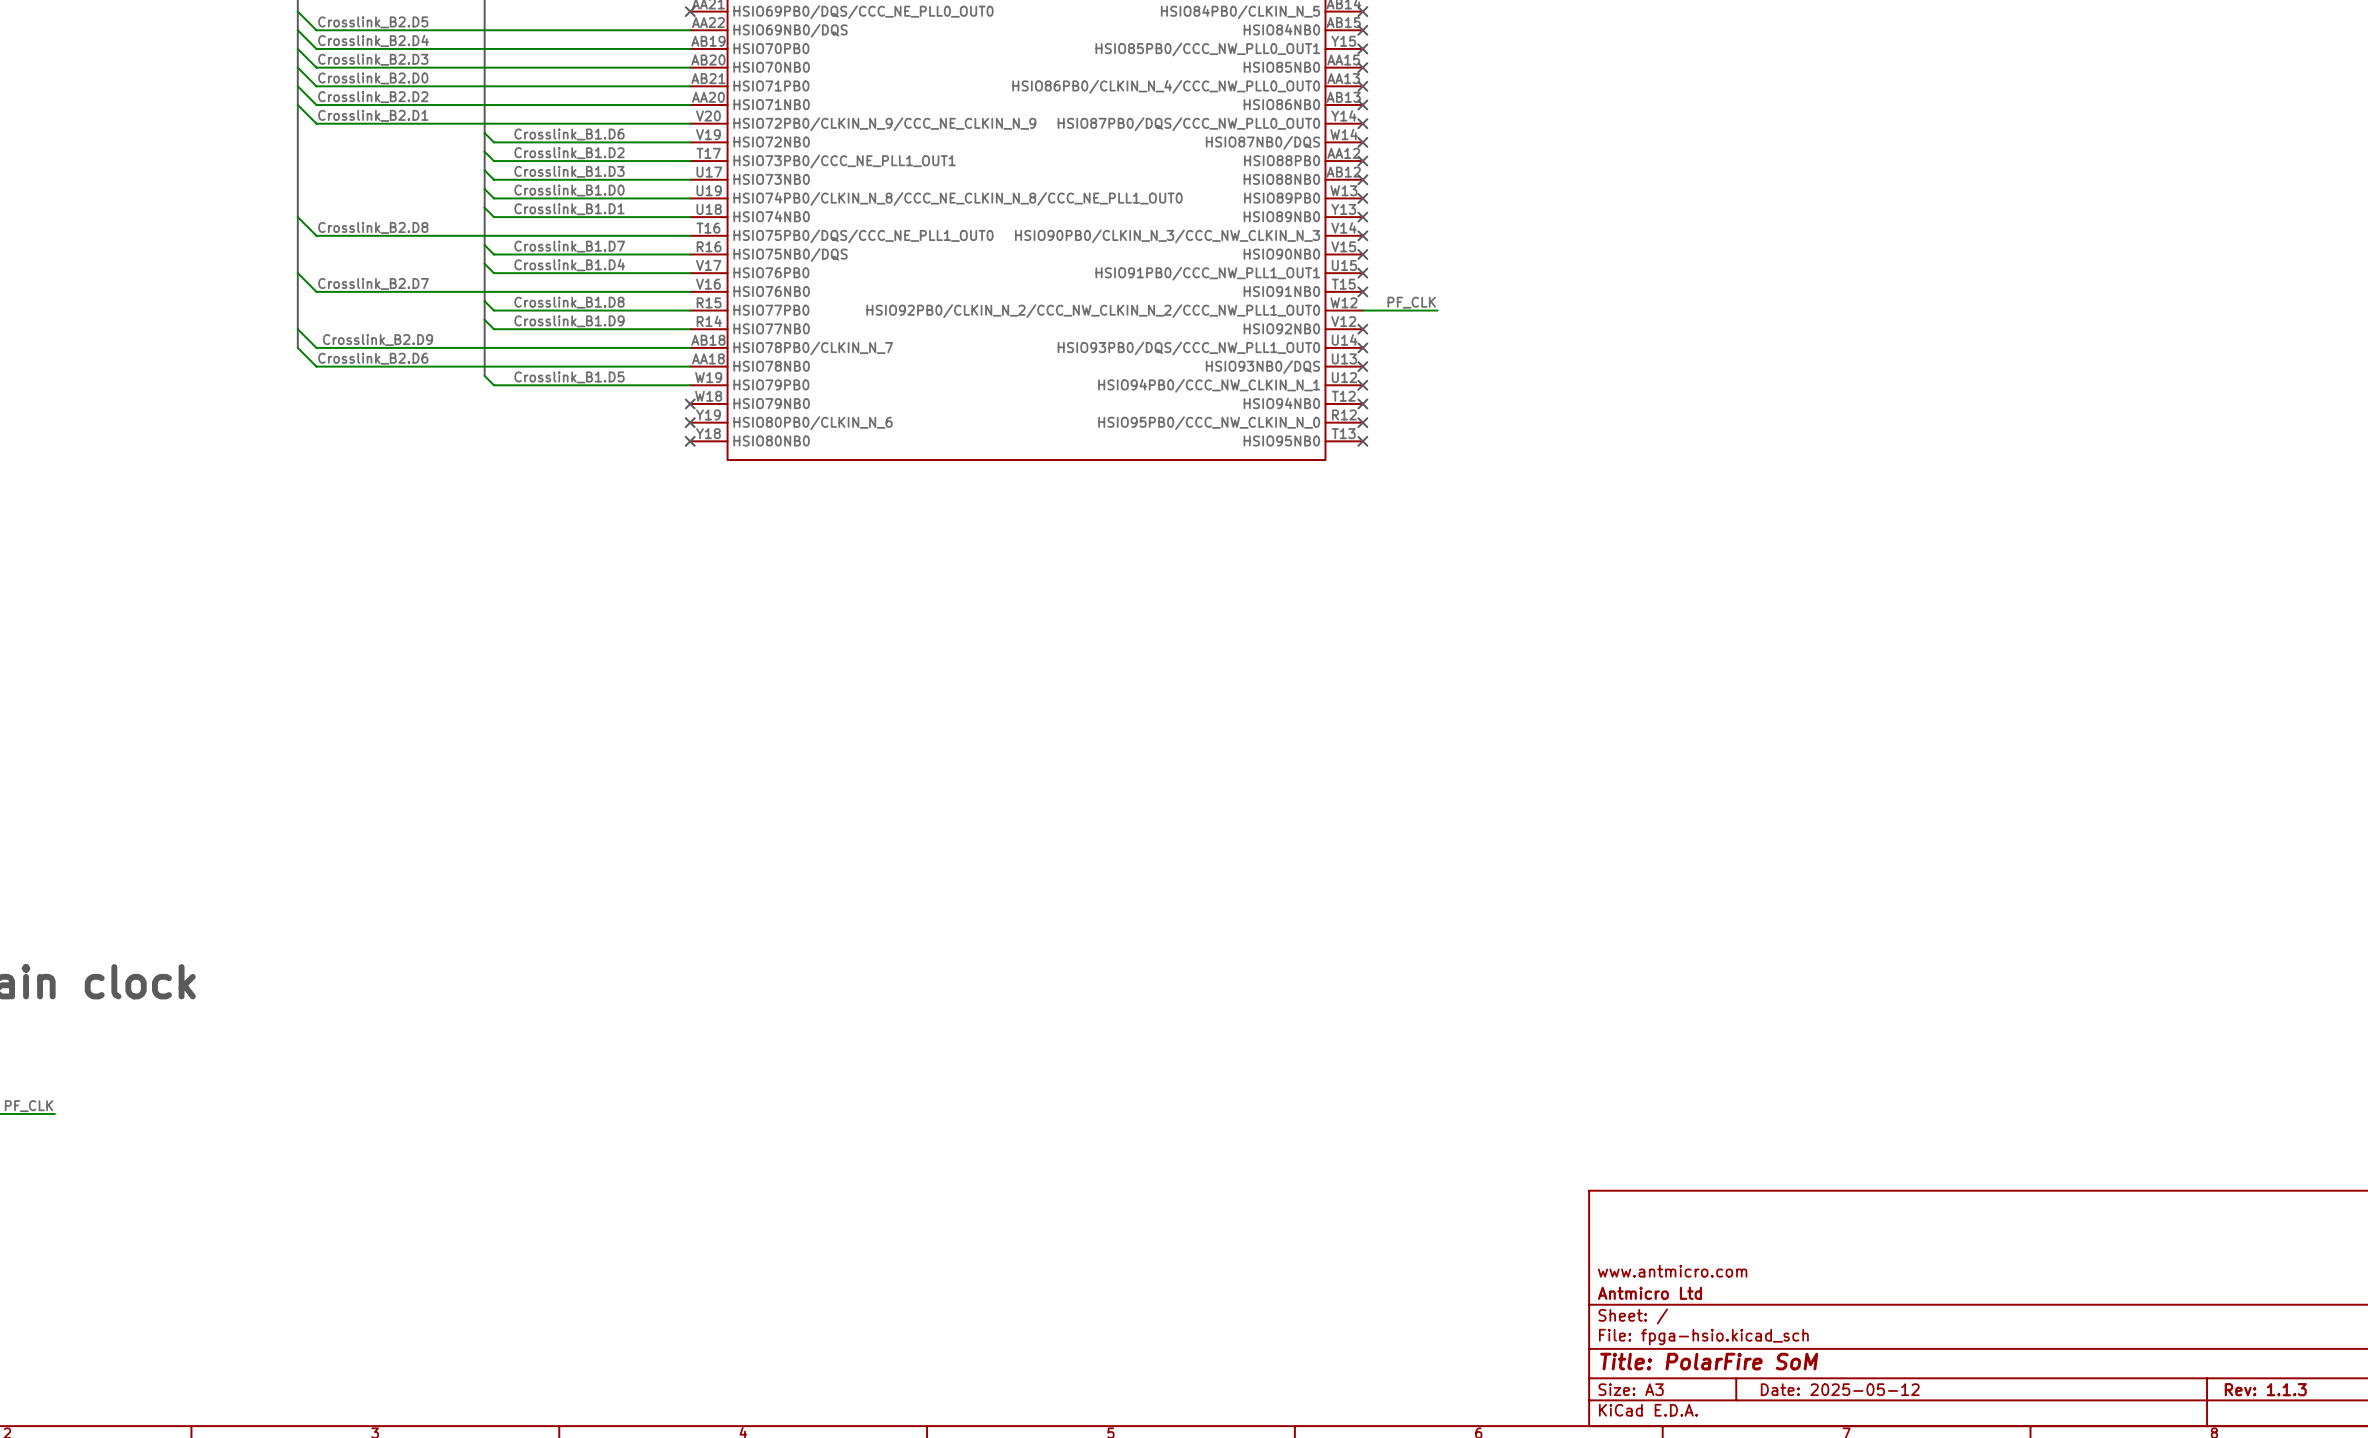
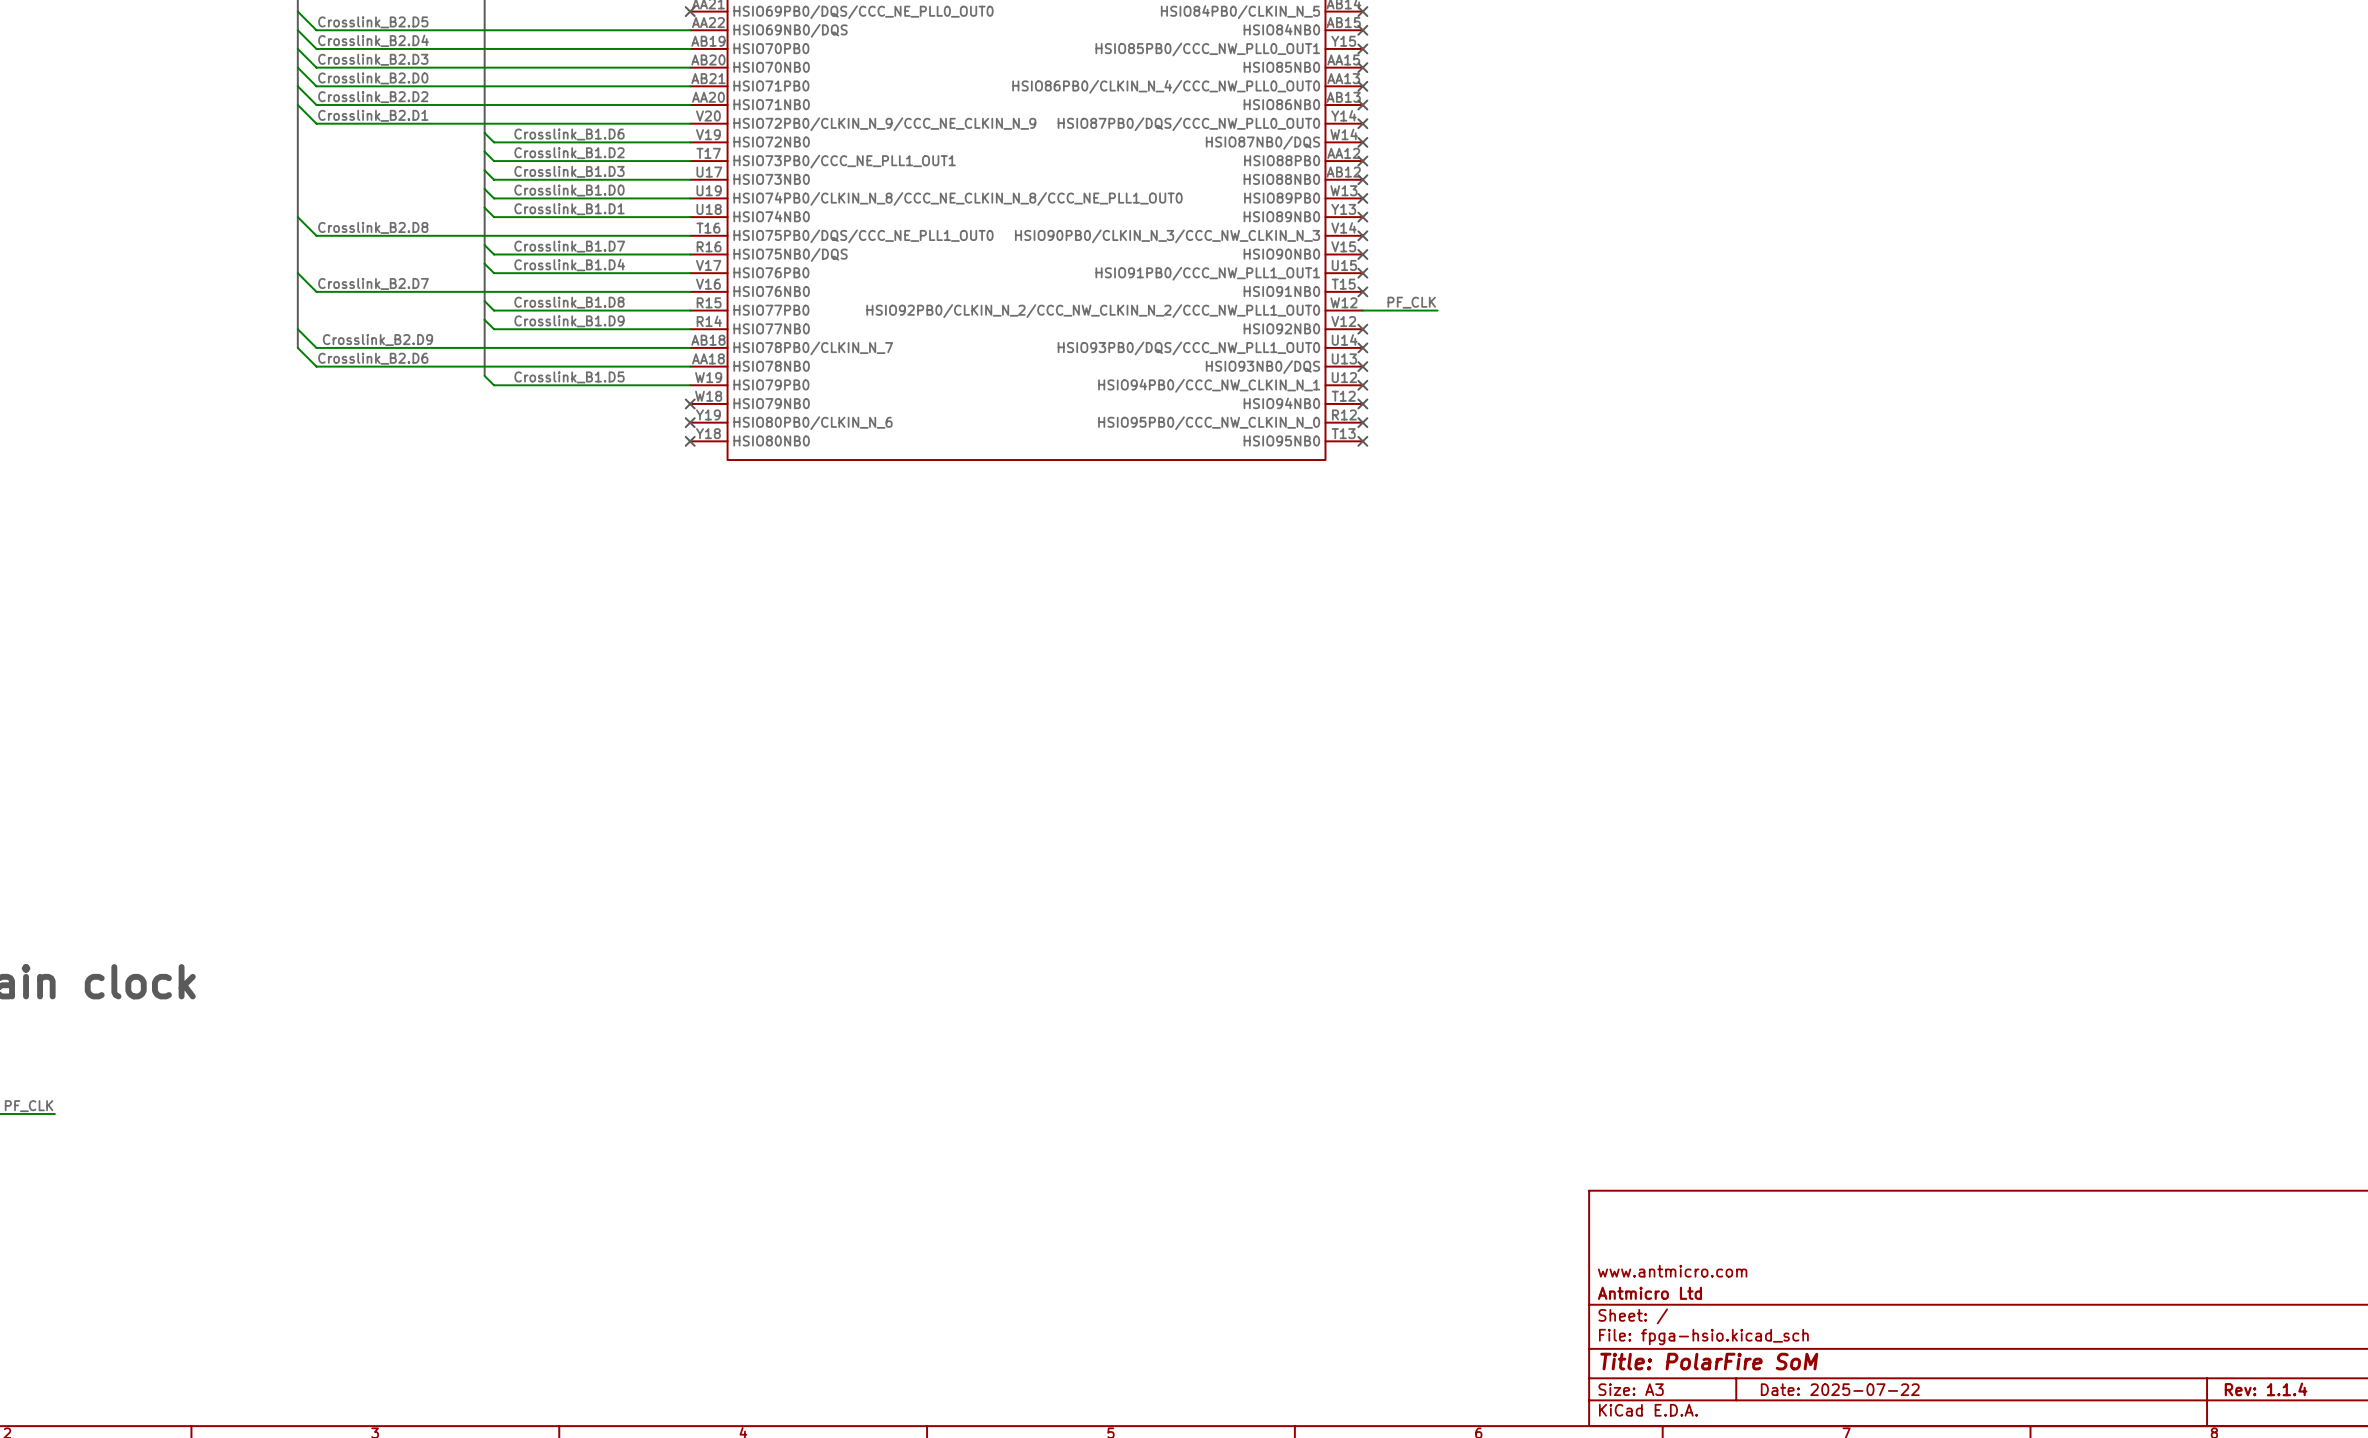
title block: Date: 2025-05-12 (1840, 1389) -> Date: 2025-07-22 (1840, 1389)
title block: Rev: 1.1.3 (2265, 1389) -> Rev: 1.1.4 (2266, 1389)

